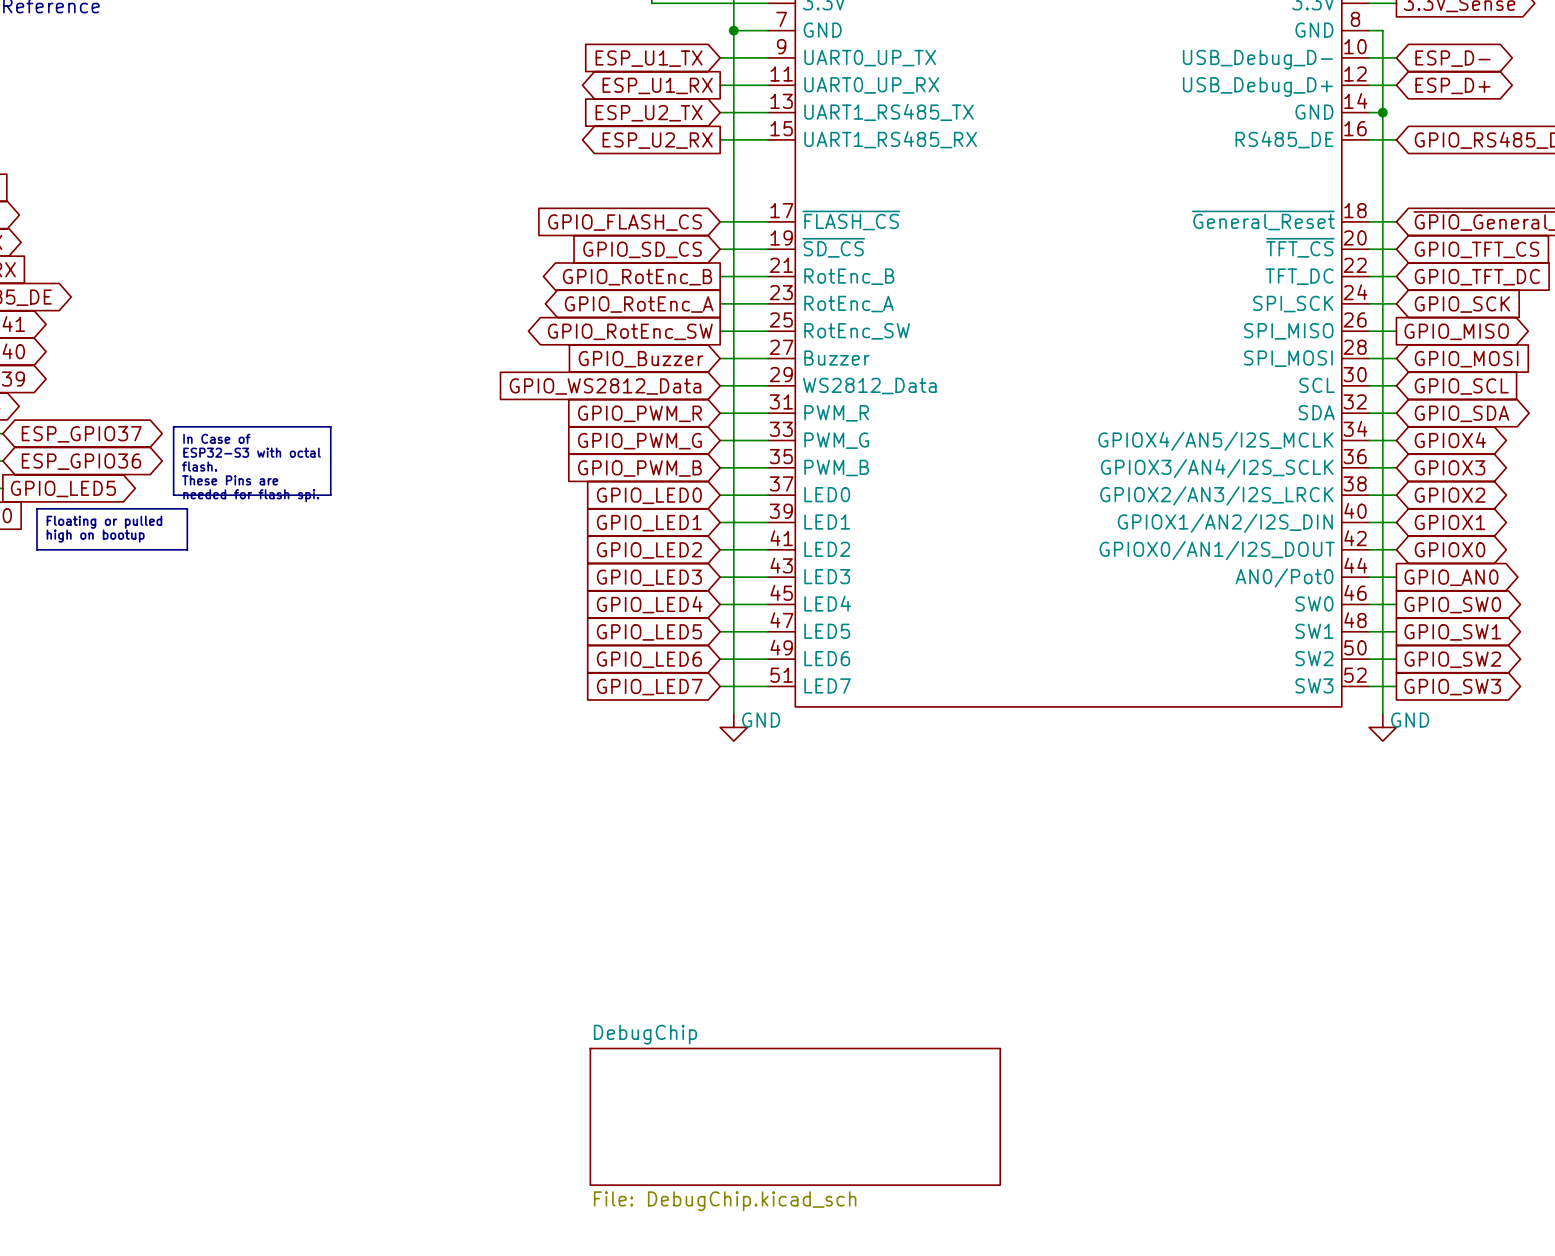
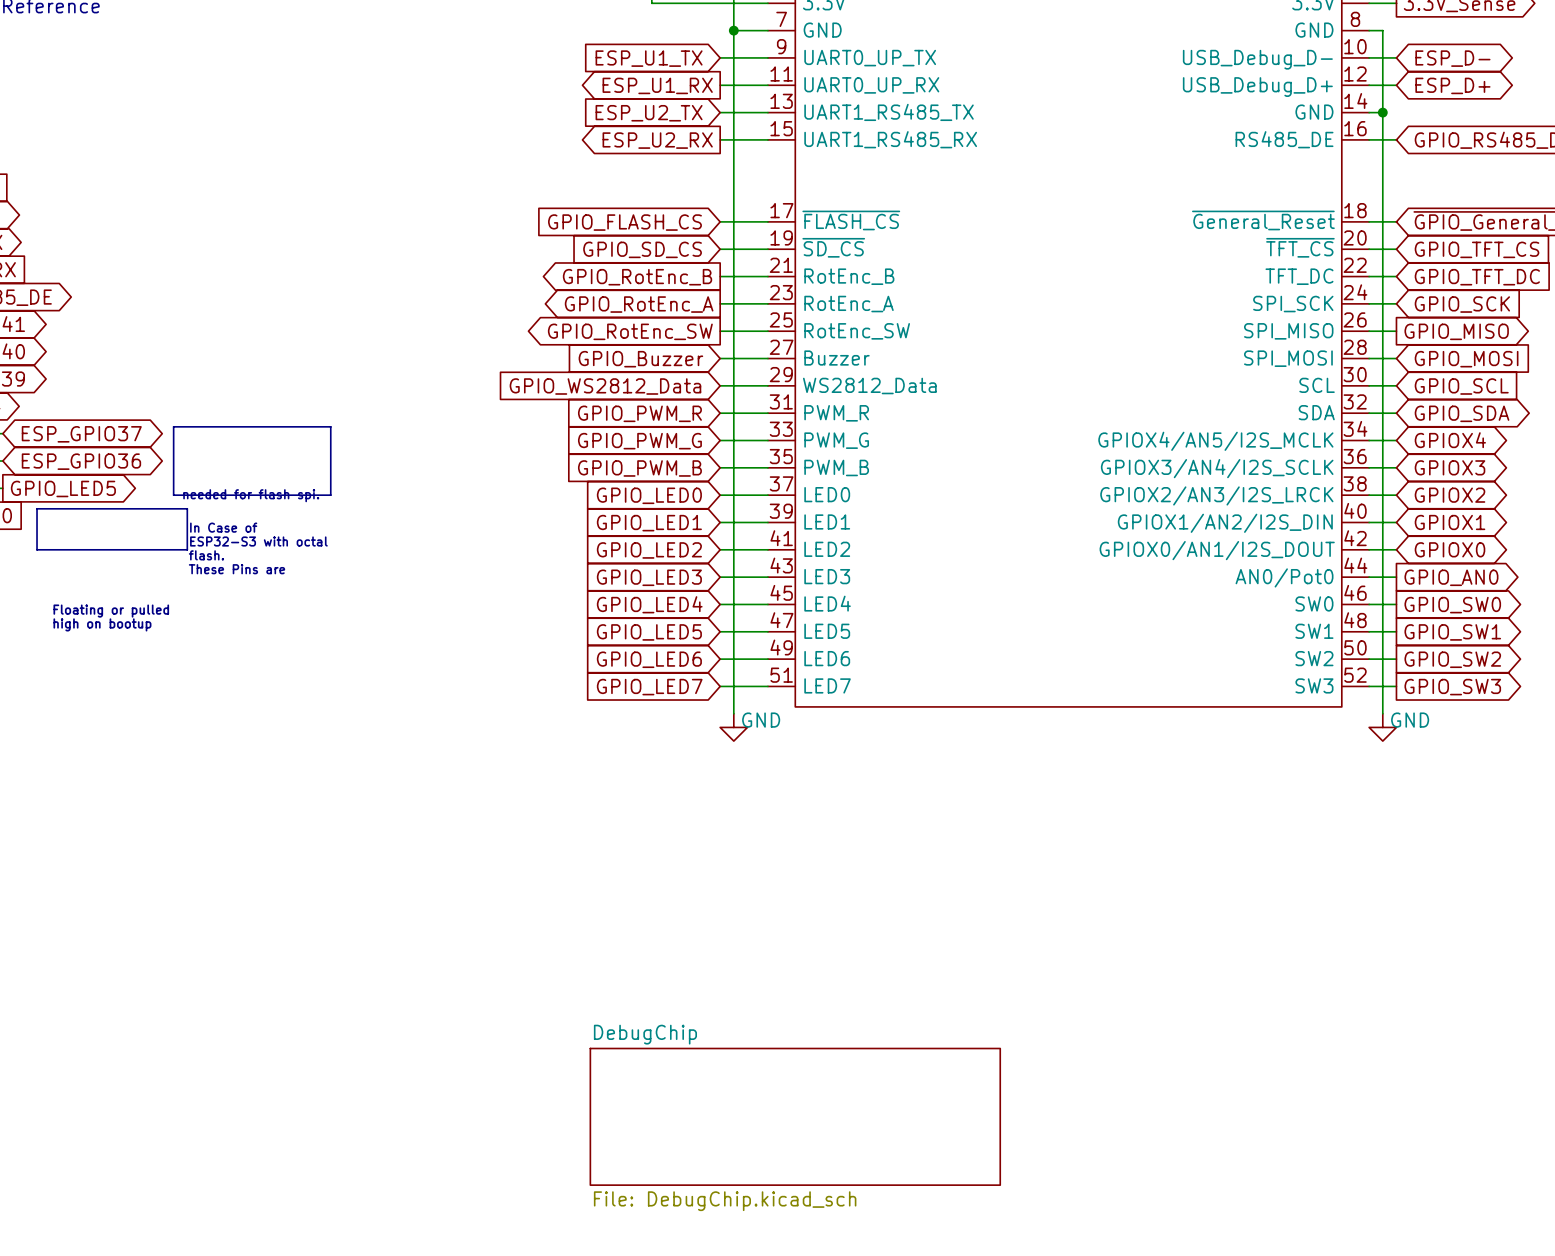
text position: In Case of (216, 438) -> In Case of (223, 527)
text position: ESP32-S3 with octal (252, 452) -> ESP32-S3 with octal (258, 541)
text position: flash. (199, 466) -> flash. (206, 555)
text position: These Pins are (230, 480) -> These Pins are (236, 569)
text position: Floating or pulled (104, 522) -> Floating or pulled (111, 611)
text position: high on bootup (95, 536) -> high on bootup (102, 624)

